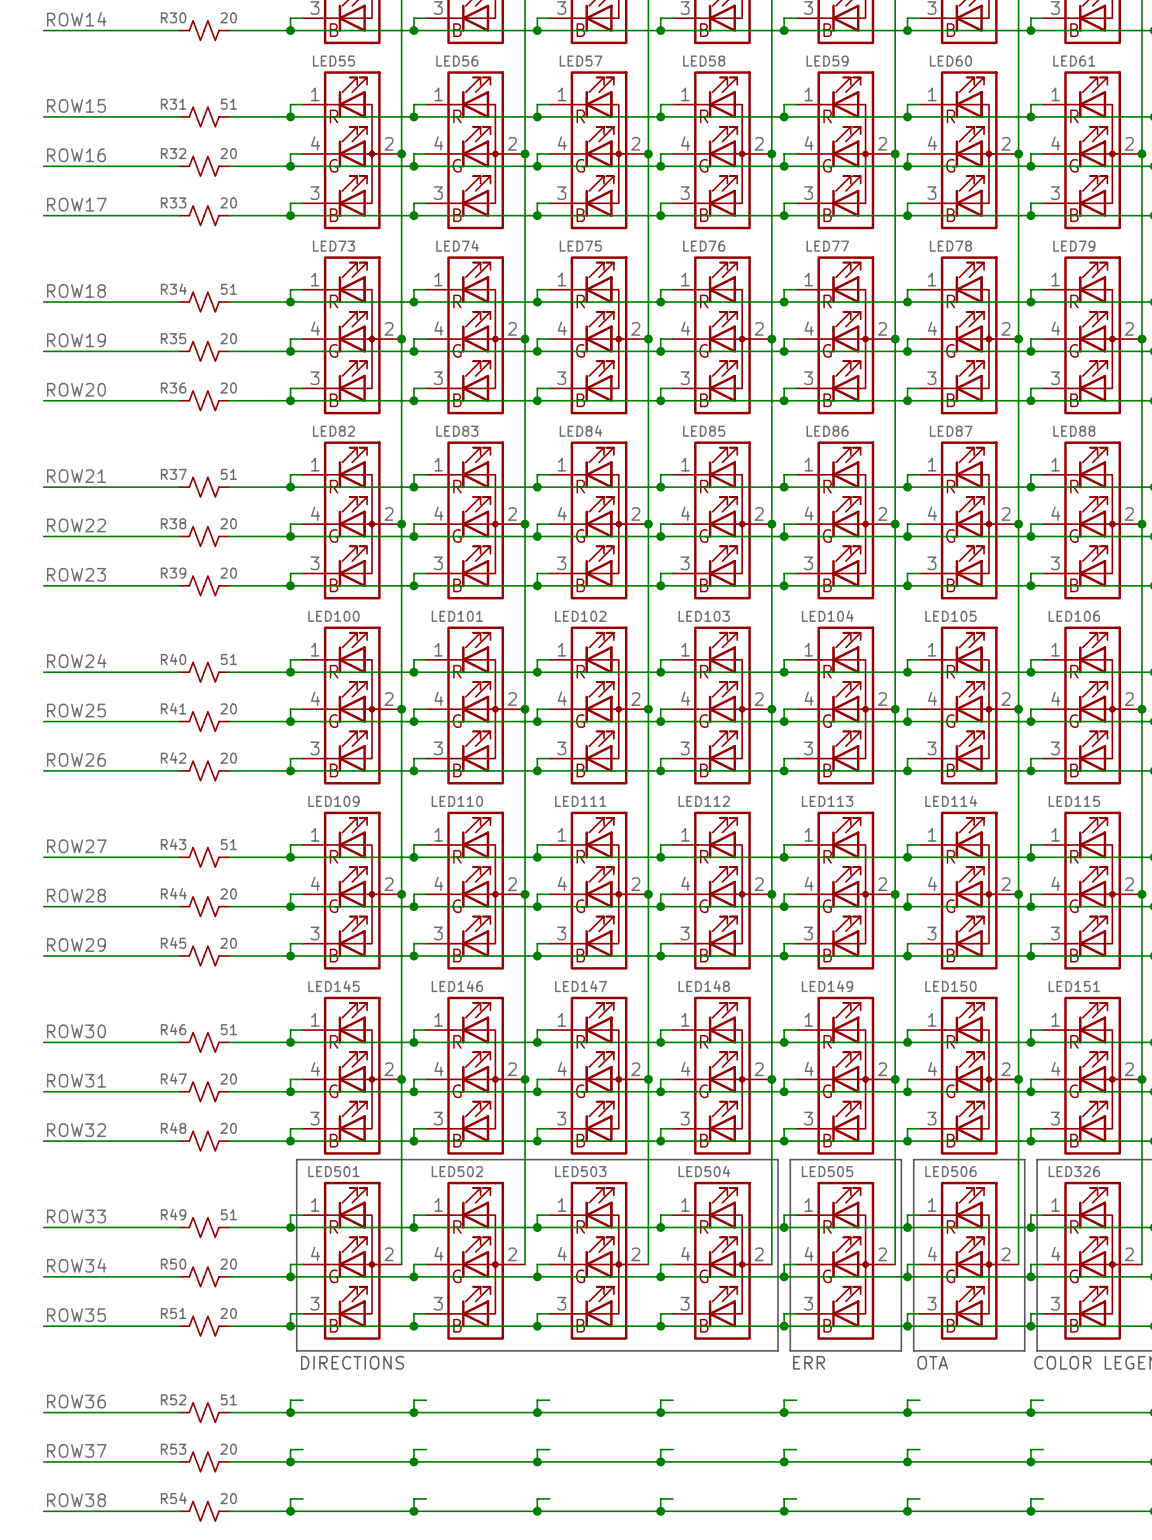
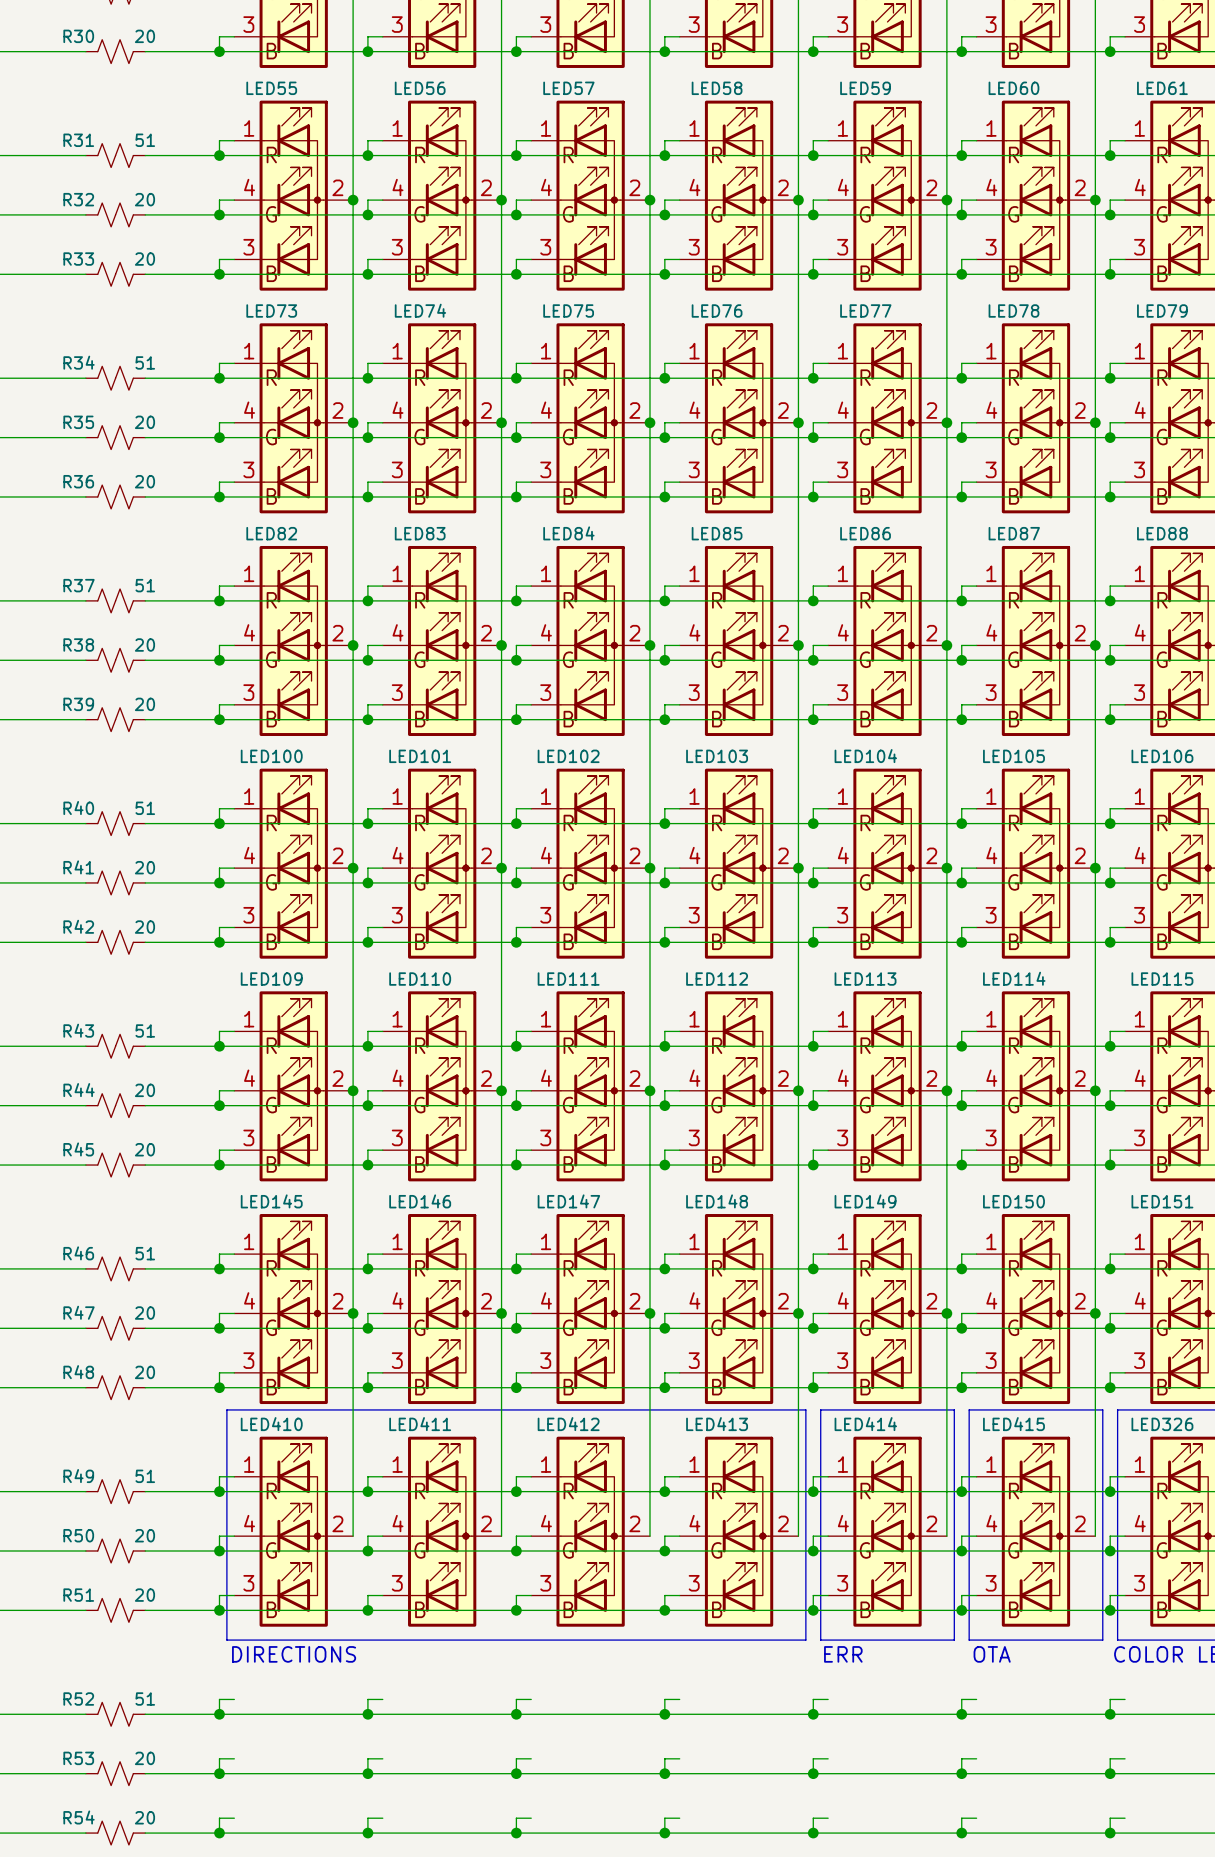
LED501 name: LED501 (333, 1171) -> LED410 (271, 1424)
LED502 name: LED502 (457, 1171) -> LED411 (420, 1424)
LED503 name: LED503 (580, 1171) -> LED412 (568, 1424)
LED504 name: LED504 (704, 1171) -> LED413 (717, 1424)
LED505 name: LED505 (827, 1171) -> LED414 (865, 1424)
LED506 name: LED506 (950, 1171) -> LED415 (1013, 1424)

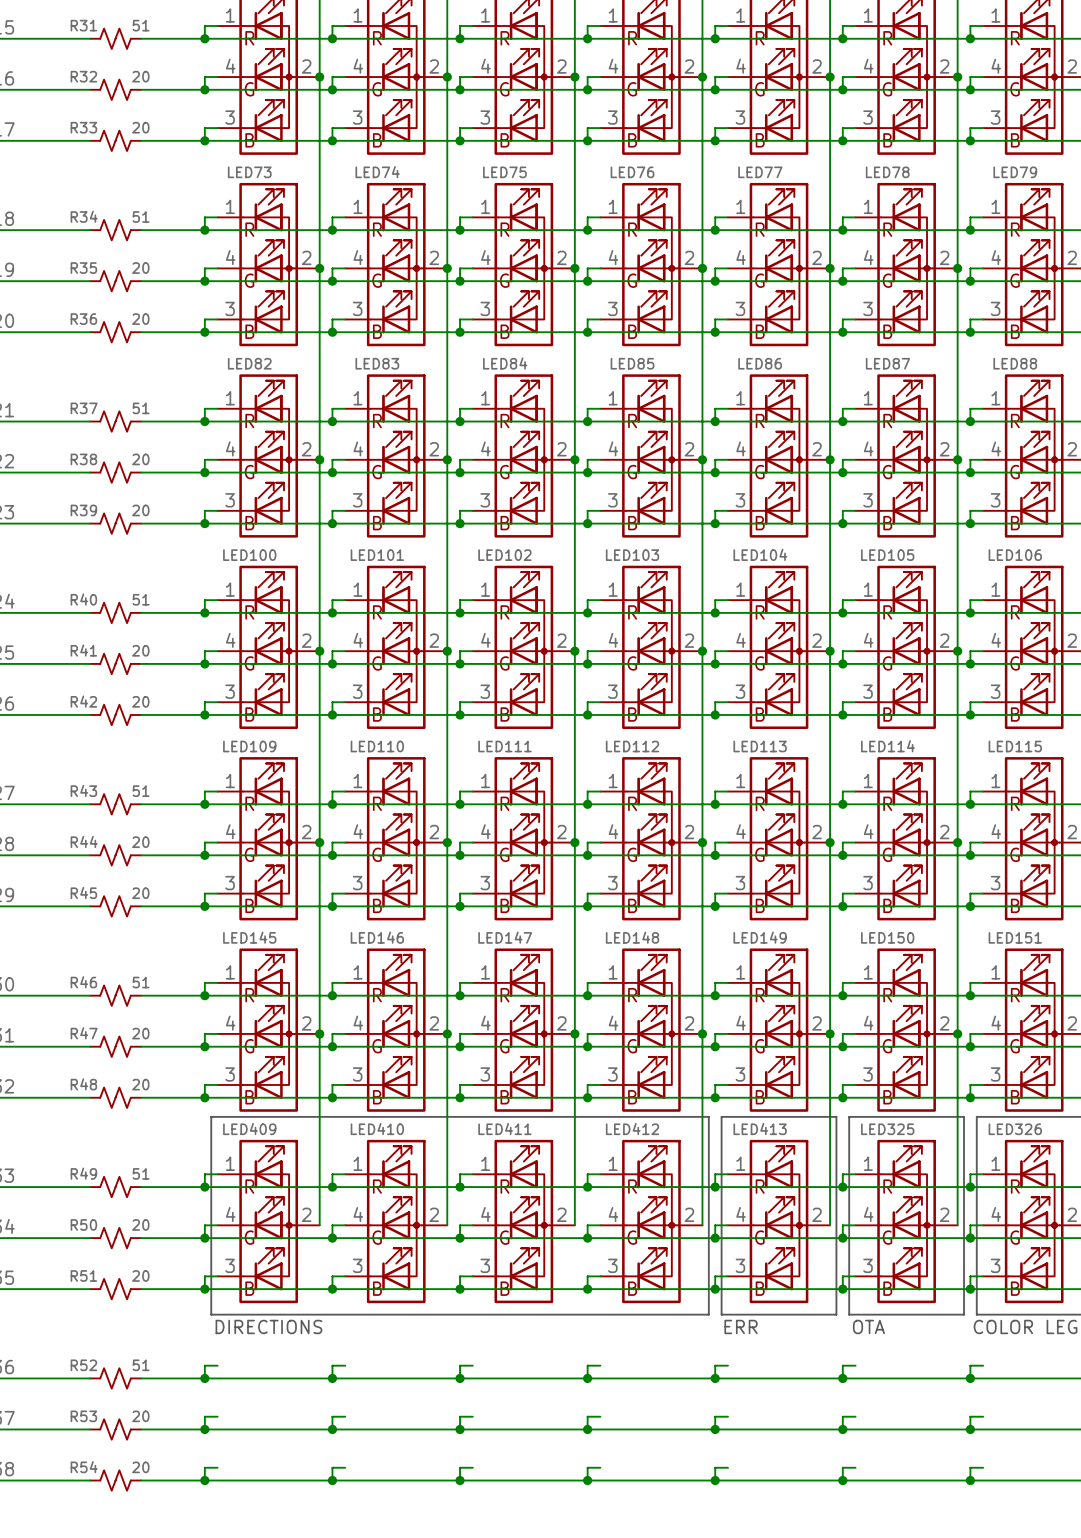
LED410 name: LED410 (271, 1424) -> LED409 (249, 1129)
LED411 name: LED411 (420, 1424) -> LED410 (377, 1129)
LED412 name: LED412 (568, 1424) -> LED411 (504, 1129)
LED413 name: LED413 (717, 1424) -> LED412 (632, 1129)
LED414 name: LED414 (865, 1424) -> LED413 (760, 1129)
LED415 name: LED415 (1013, 1424) -> LED325 (887, 1129)

